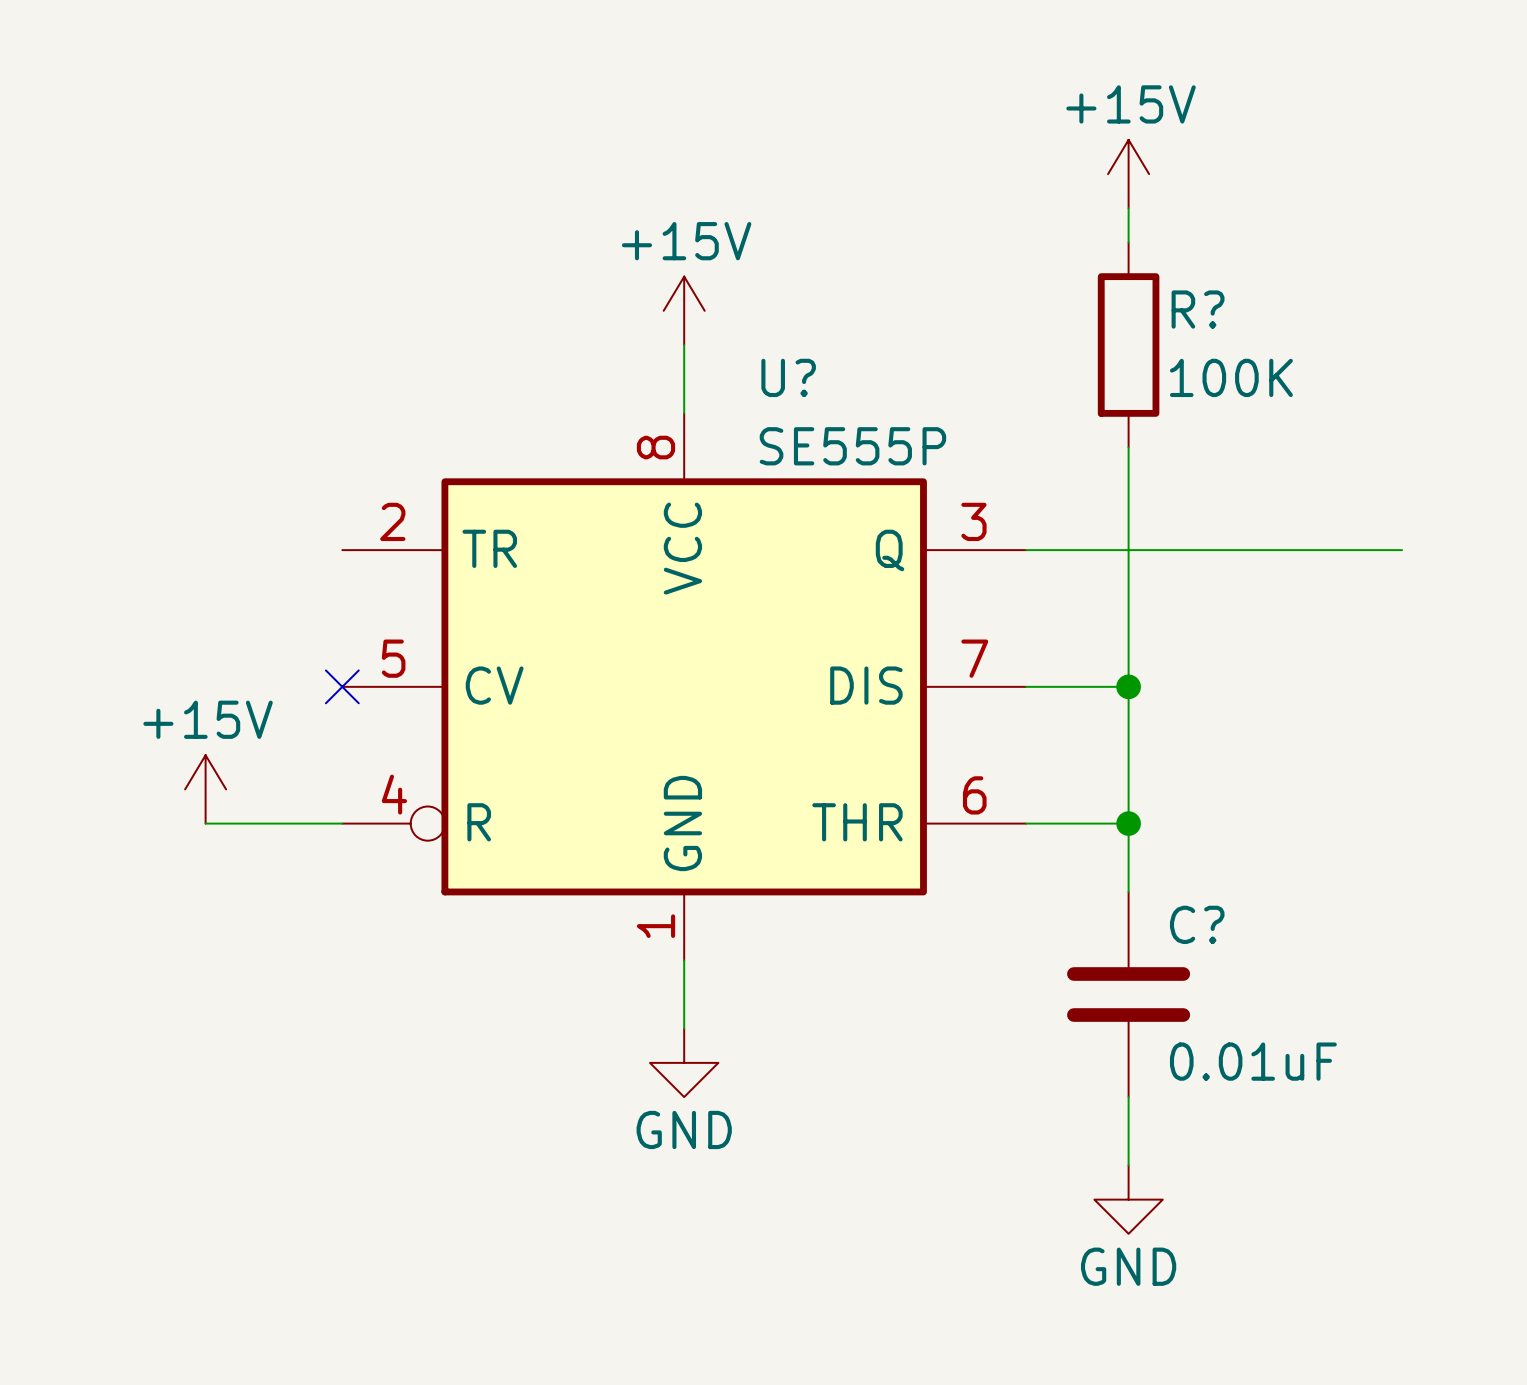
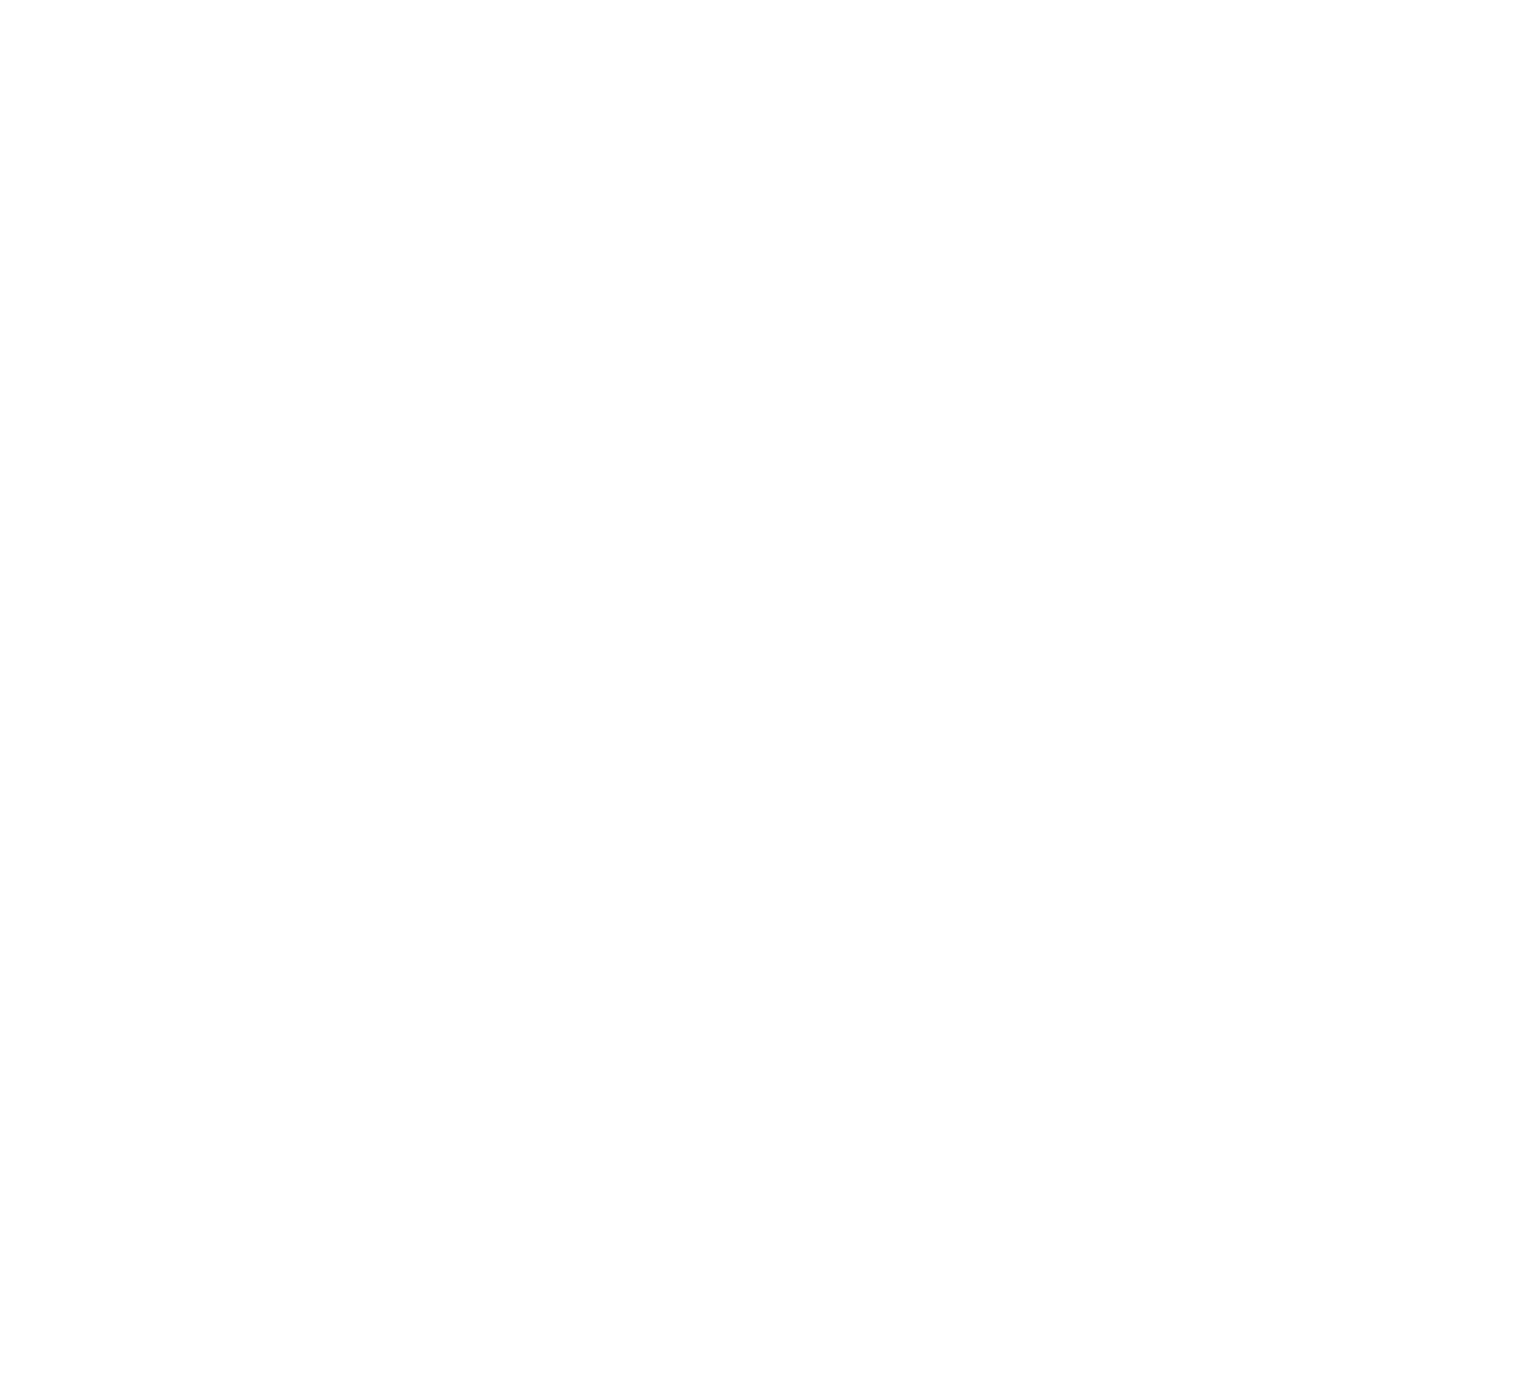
power symbol: +15V (1128, 174) -> none
wire: (1128, 208) (1128, 242) -> none
power symbol: +15V (684, 310) -> none
wire: (684, 345) (684, 413) -> none
R?: 100K (1128, 345) -> none
wire: (1128, 447) (1128, 891) -> none
wire: (1026, 550) (1402, 550) -> none
no-connect mark: (342, 686) -> none
U?: SE555P (684, 686) -> none
wire: (1026, 686) (1128, 686) -> none
junction: (1128, 686) -> none
power symbol: +15V (205, 789) -> none
wire: (205, 823) (342, 823) -> none
wire: (1026, 823) (1128, 823) -> none
junction: (1128, 823) -> none
wire: (684, 960) (684, 1028) -> none
C?: 0.01uF (1128, 994) -> none
power symbol: GND (684, 1062) -> none
wire: (1128, 1097) (1128, 1165) -> none
power symbol: GND (1128, 1199) -> none

